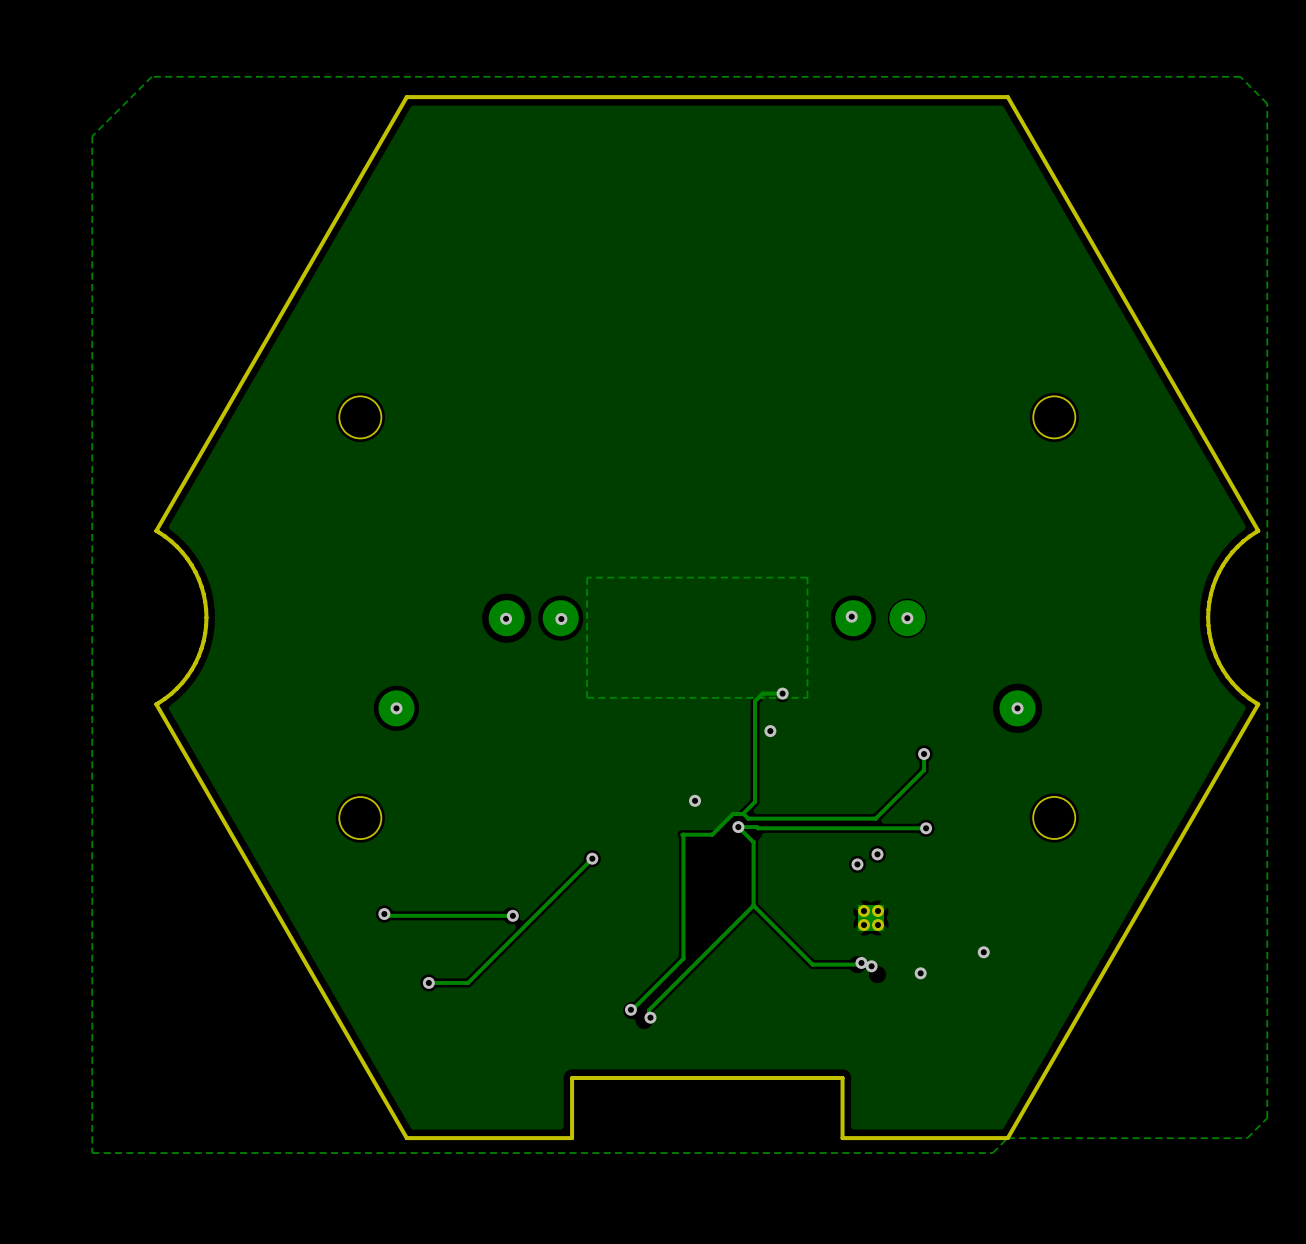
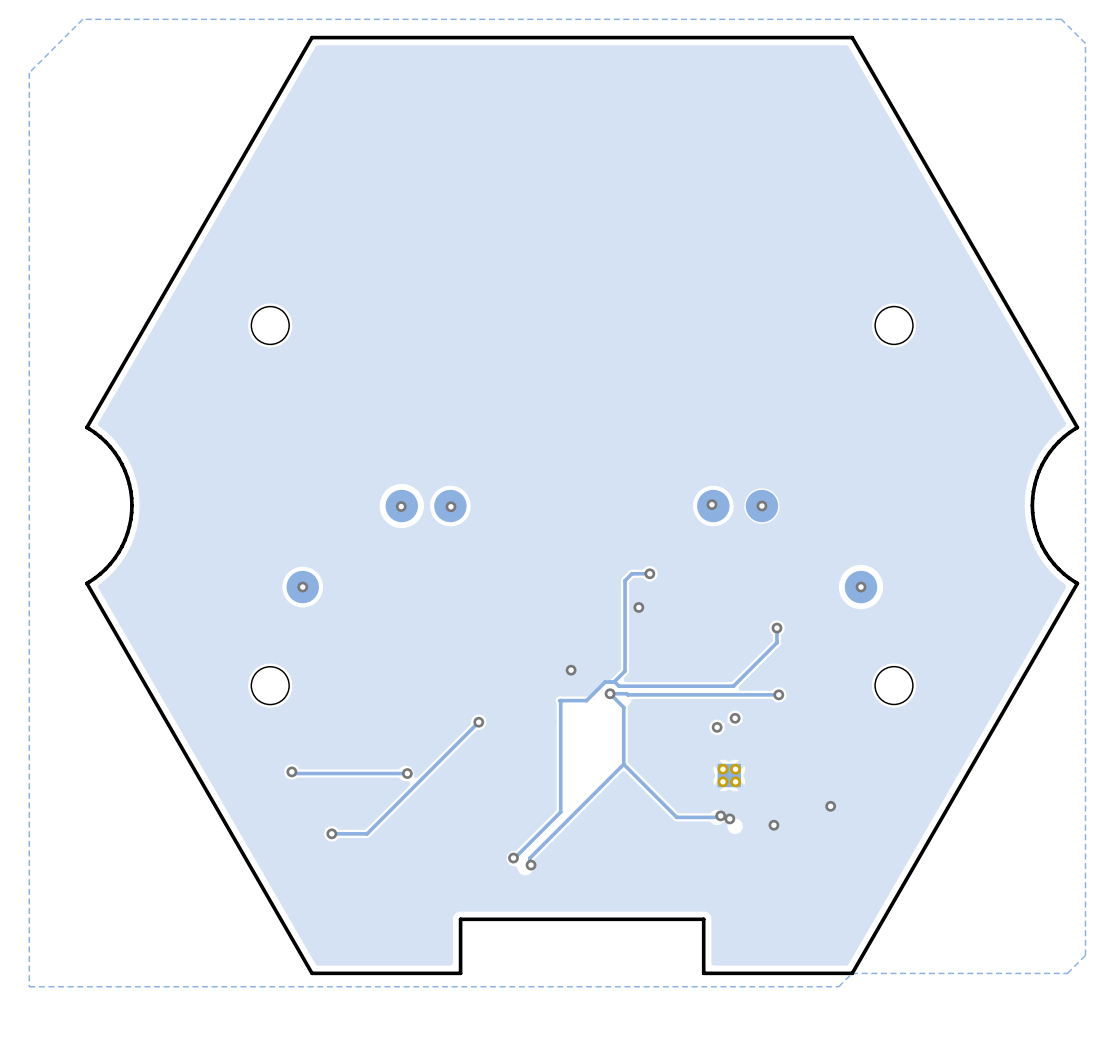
zone outline: (807, 577) (587, 577) (587, 697) (807, 697) (807, 577) -> none

